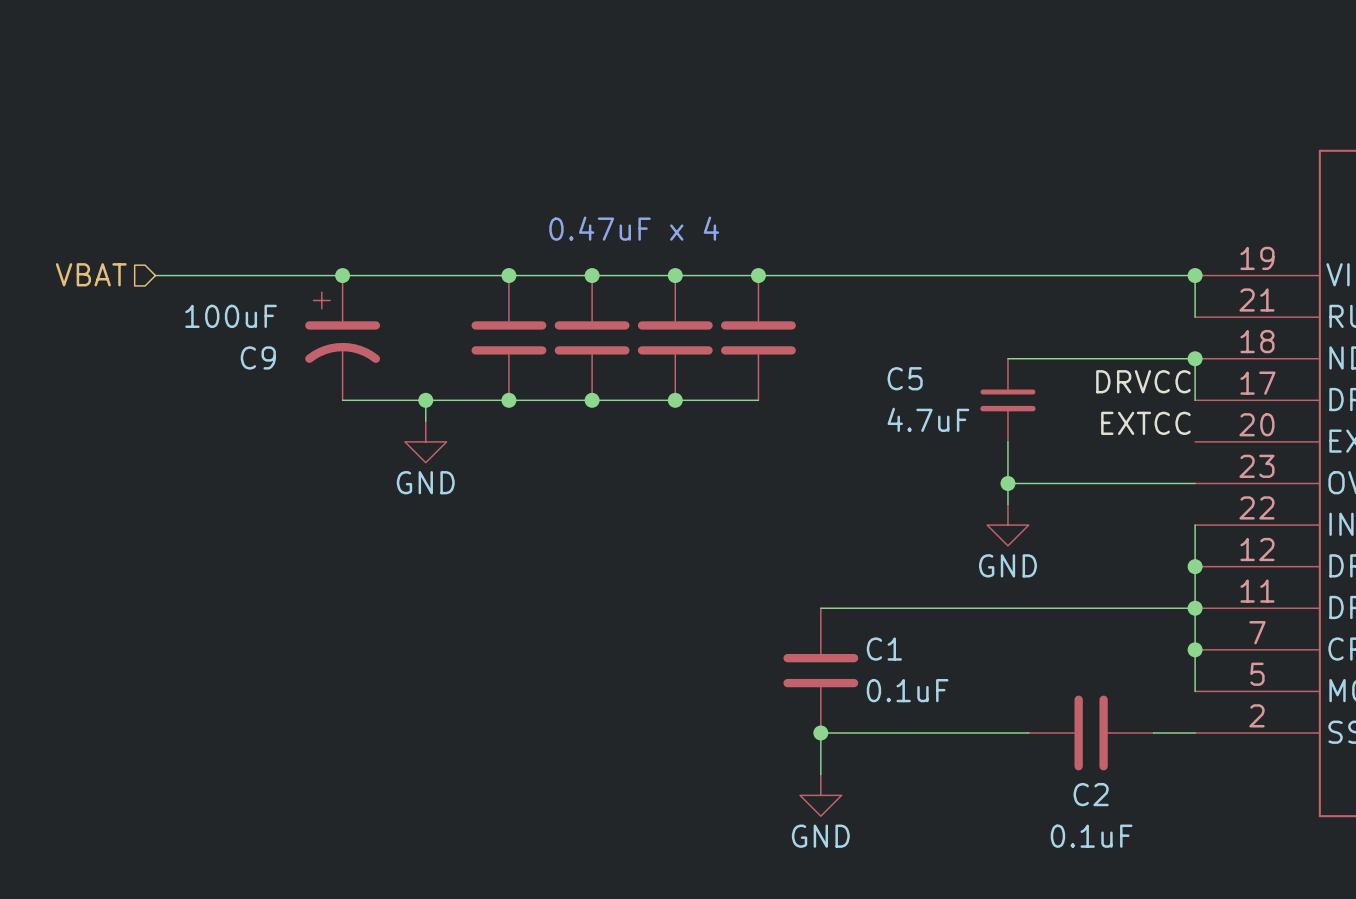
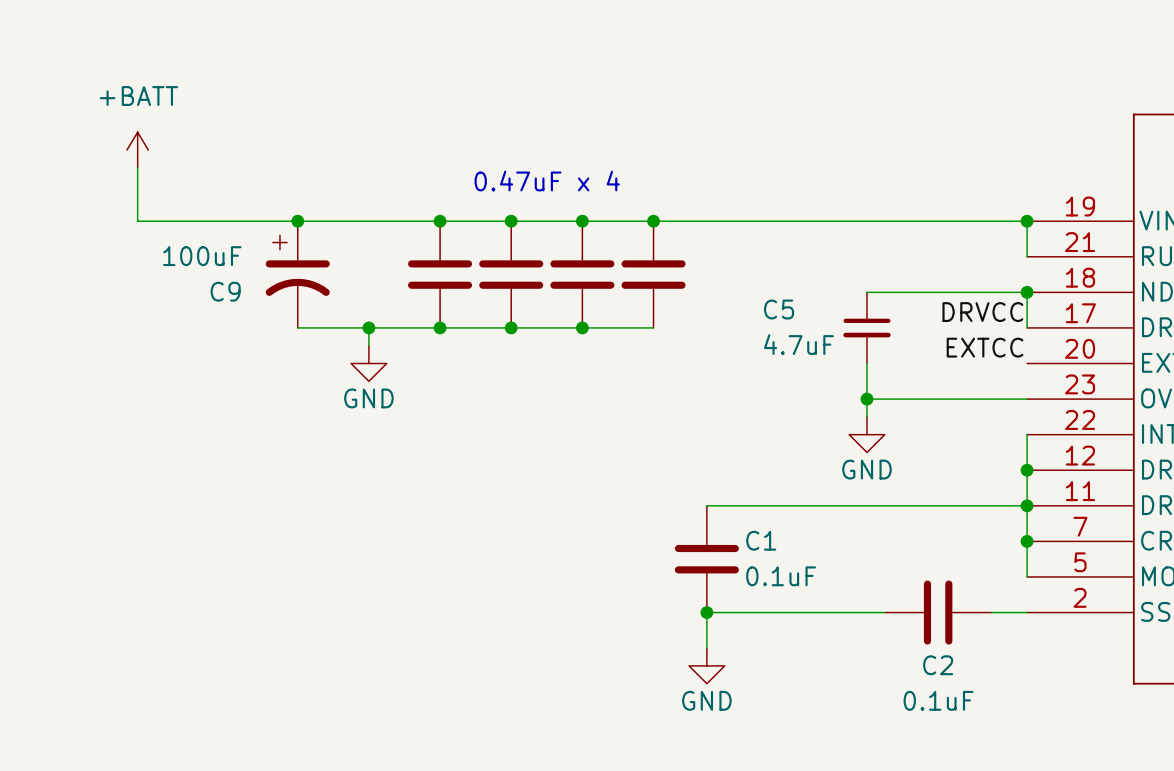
power symbol: none -> +BATT (137, 150)
wire: none -> (137, 167) (137, 221)
hierarchical label: VBAT (91, 274) -> none

